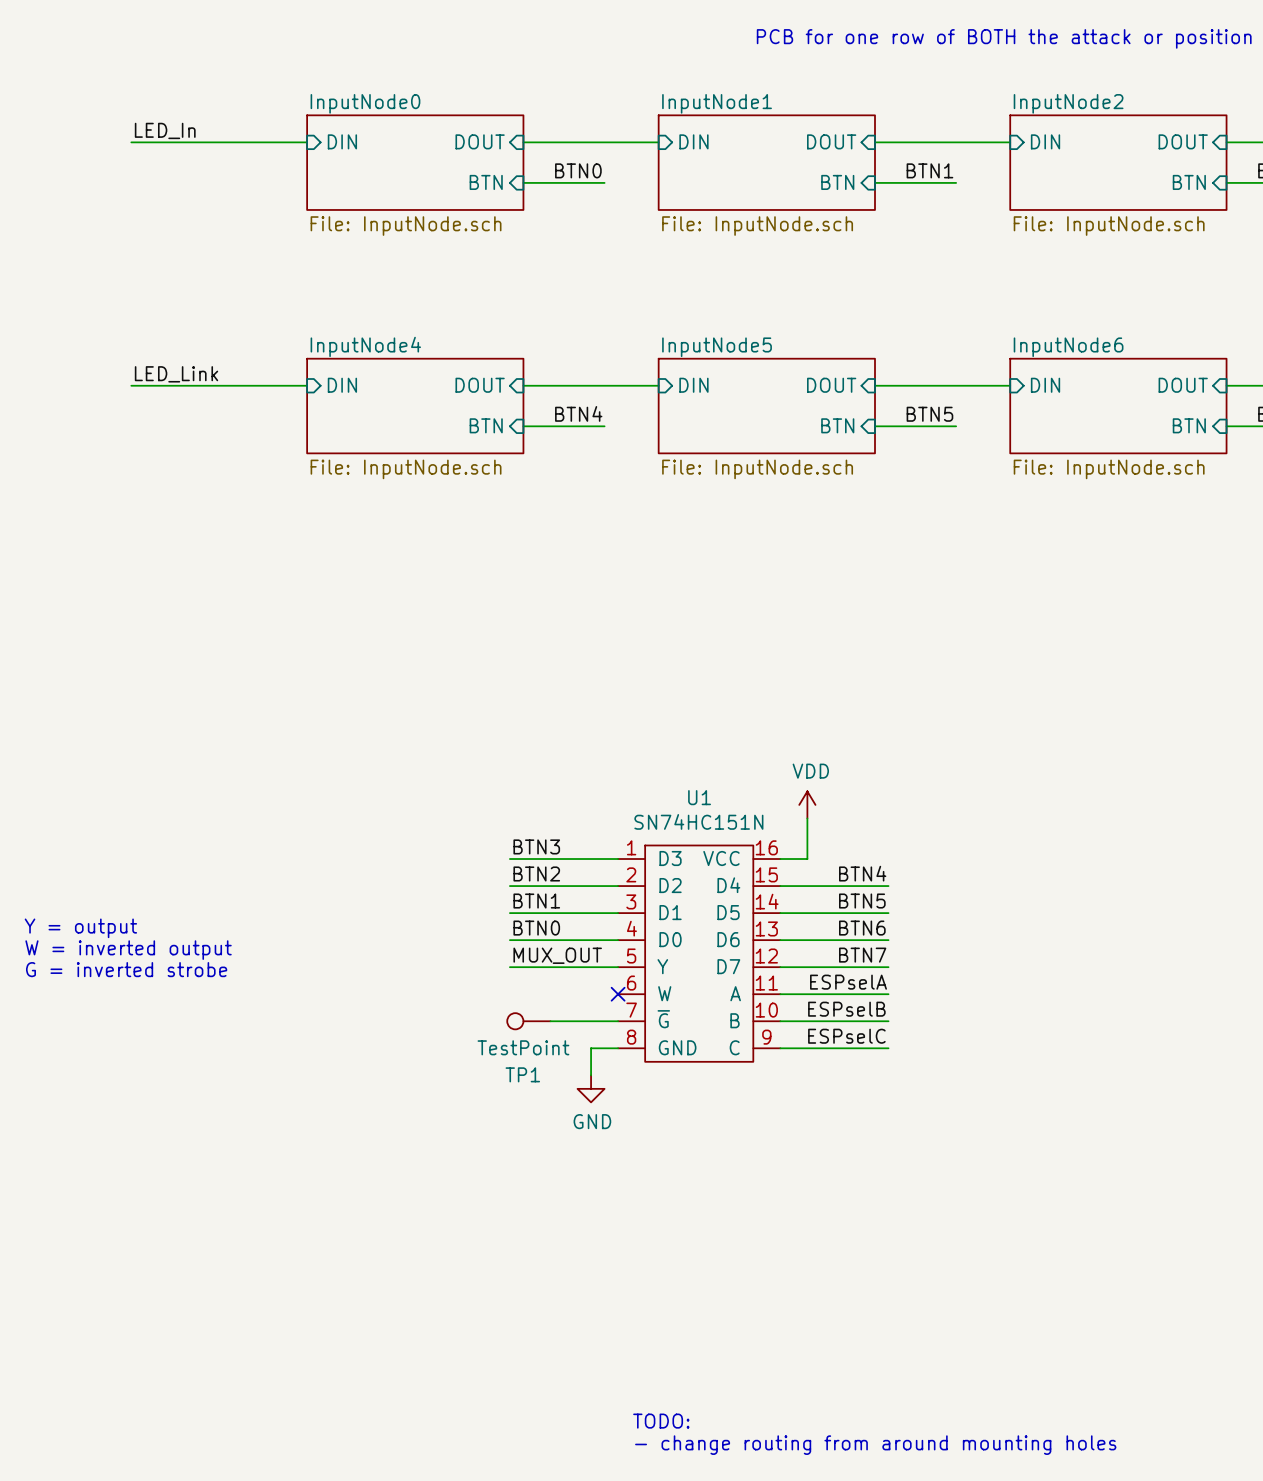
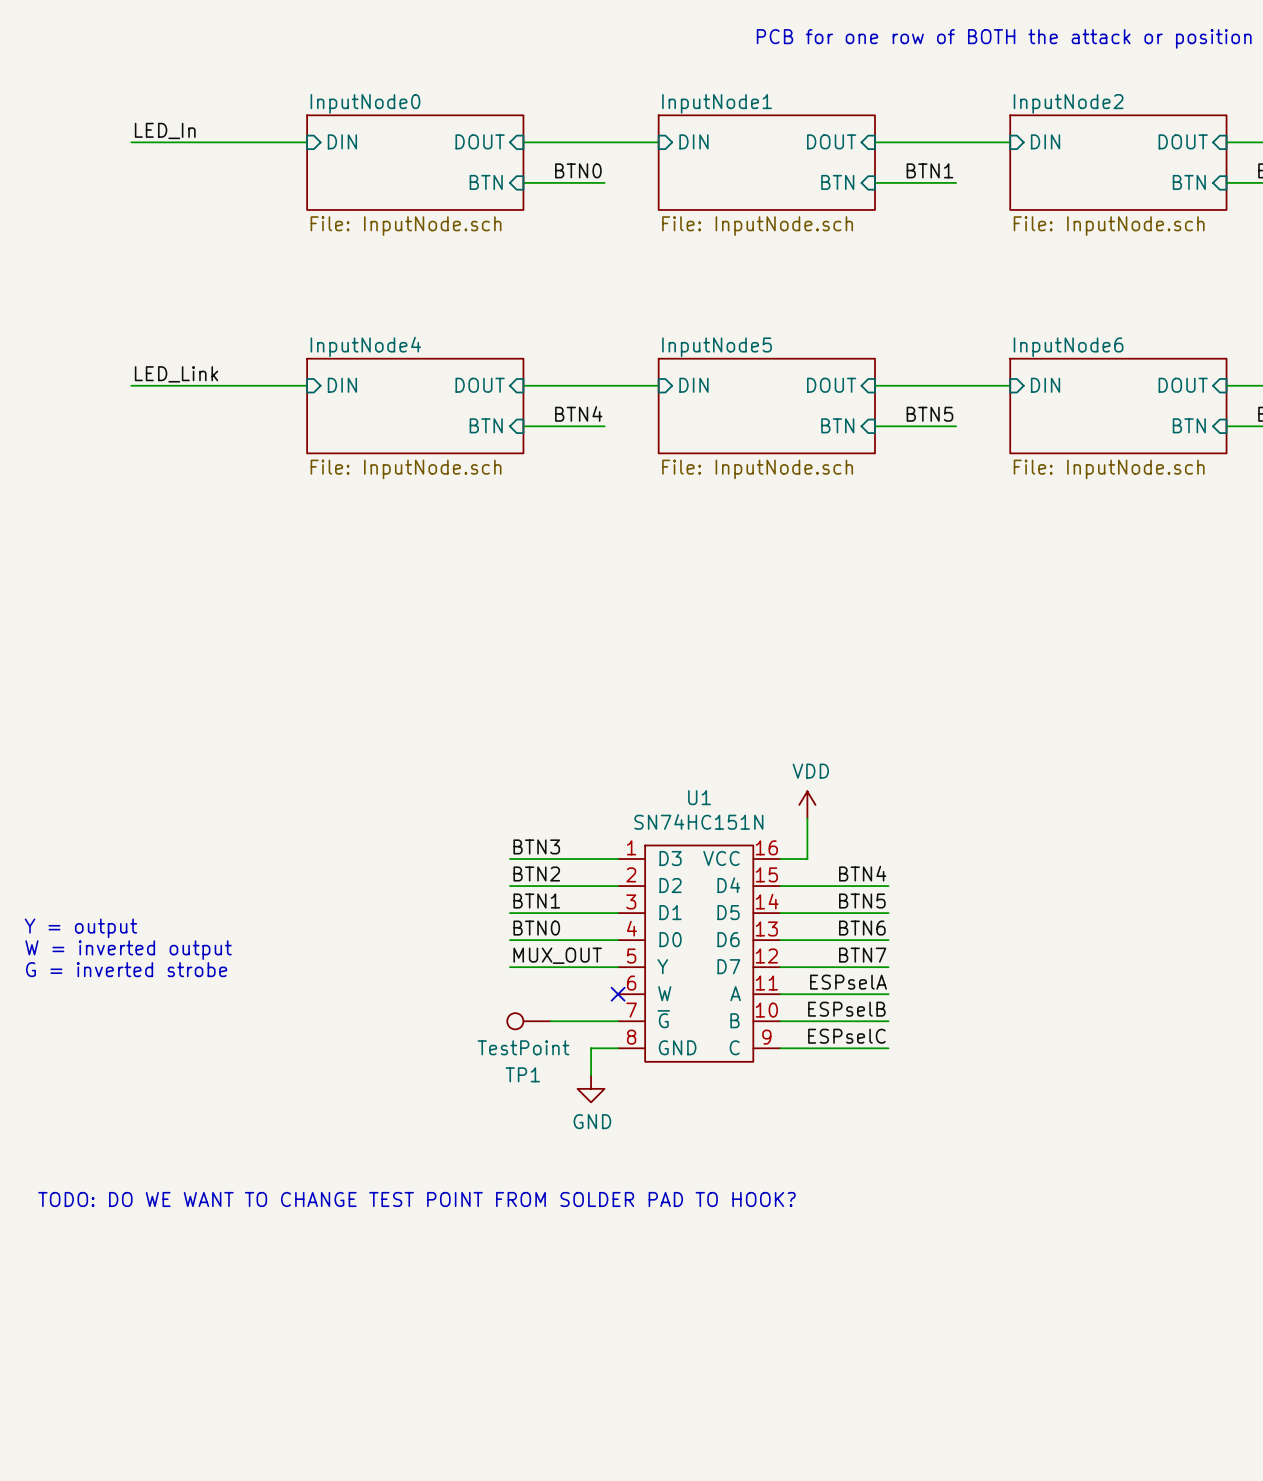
text: none -> TODO: DO WE WANT TO CHANGE TEST POINT FROM SOLDER PAD TO HOOK? (416, 1199)
text: TODO: (661, 1421) -> none
text: - change routing from around mounting holes (875, 1445) -> none

